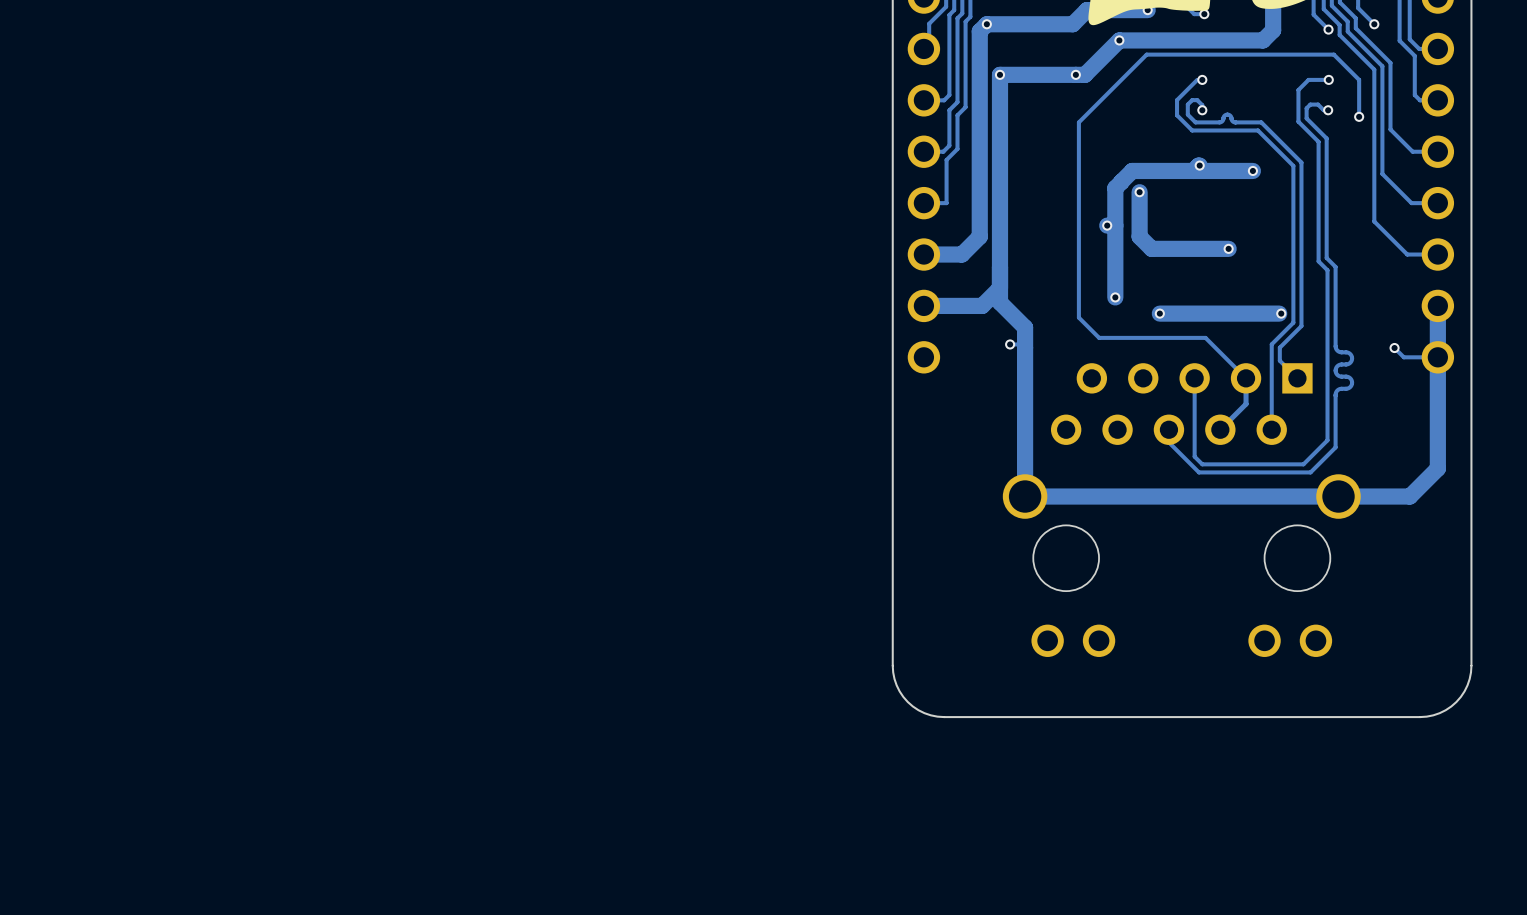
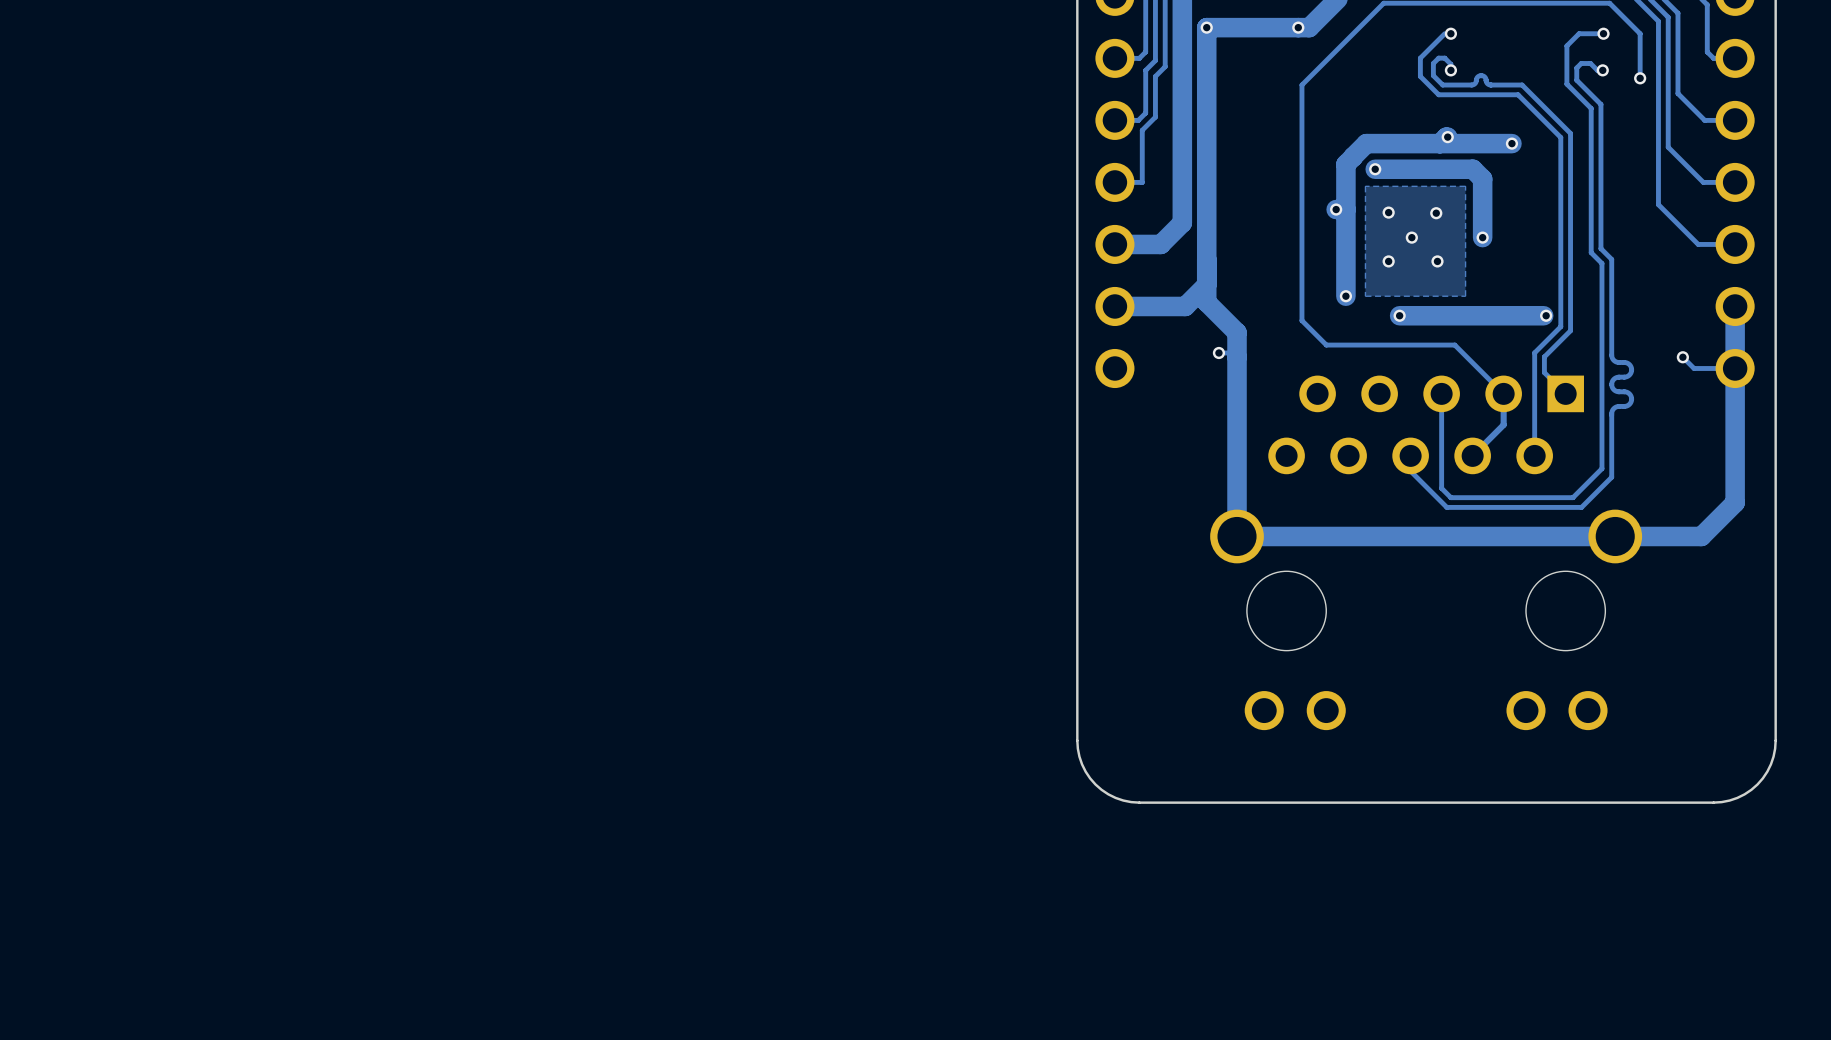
track: (1139, 192) (1139, 236) (1151, 248) (1228, 248) -> (1375, 169) (1472, 169) (1482, 179) (1482, 237)
zone outline: none -> (1465, 186) (1465, 296) (1365, 296) (1365, 186) (1465, 186)
via: none -> (1388, 212)
via: none -> (1436, 213)
via: none -> (1411, 237)
via: none -> (1388, 261)
via: none -> (1437, 261)

